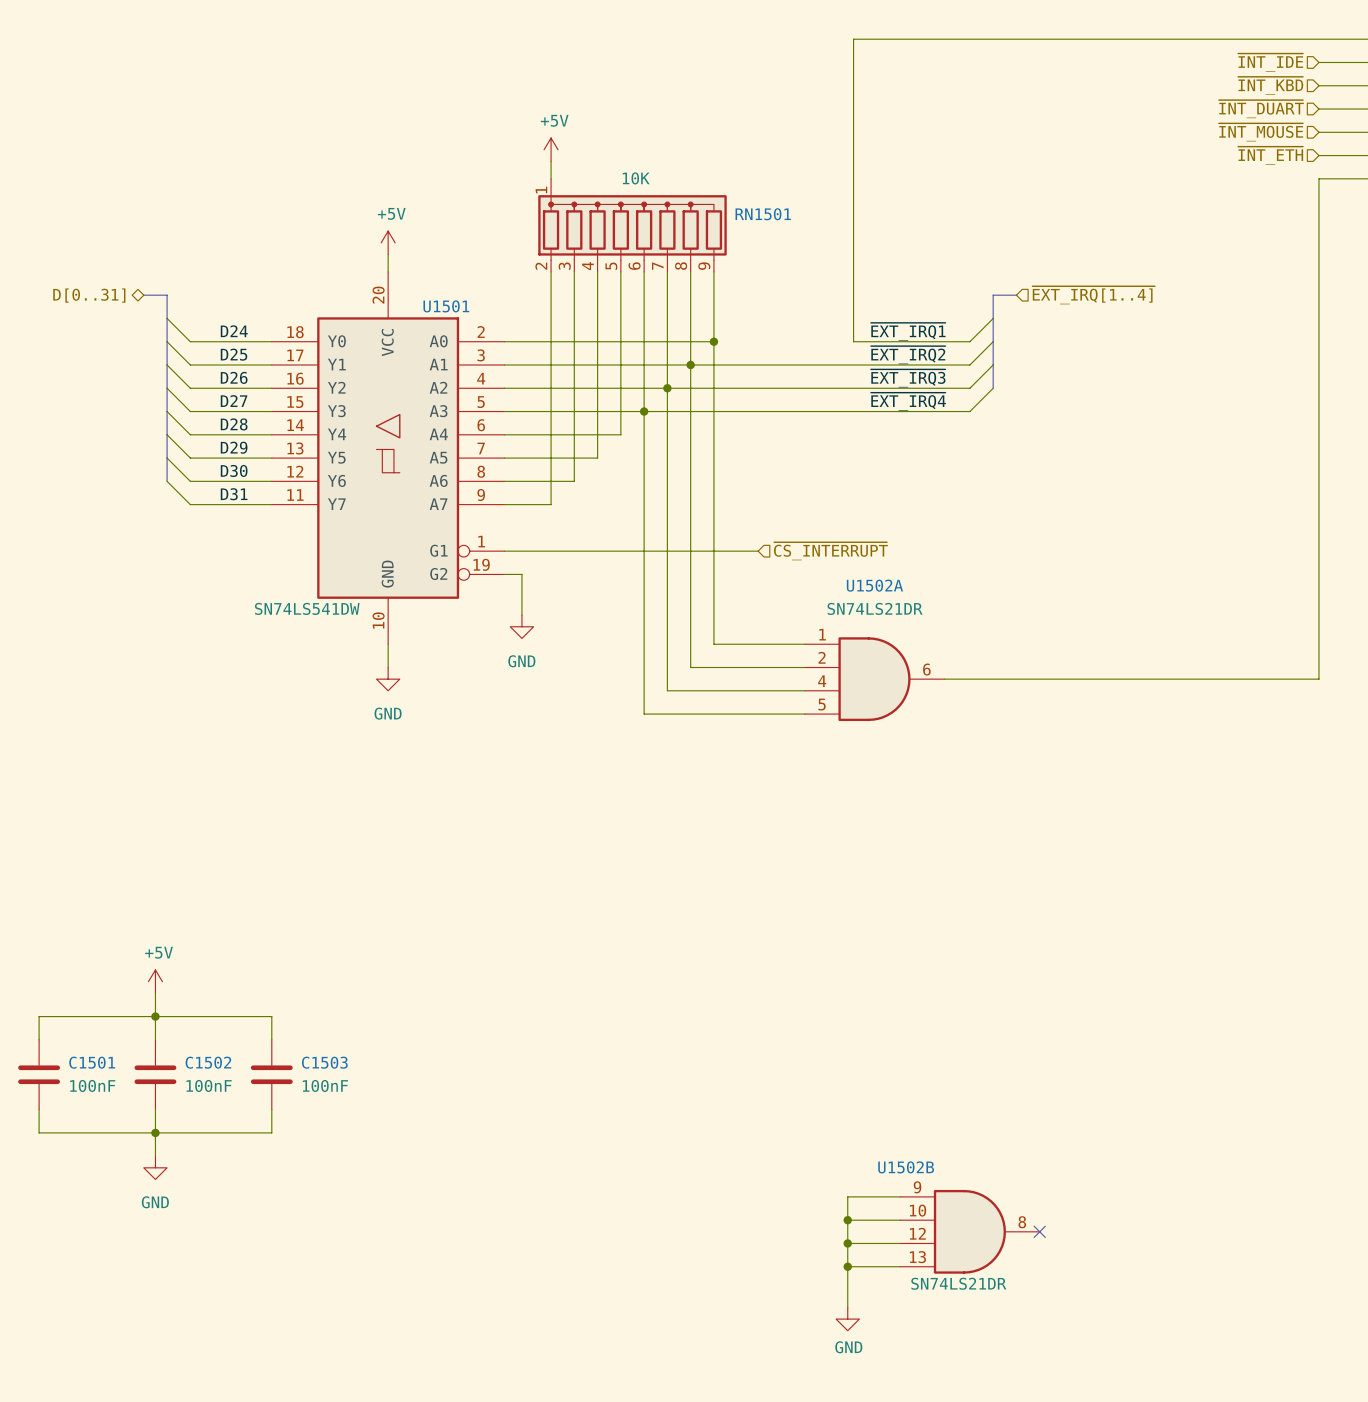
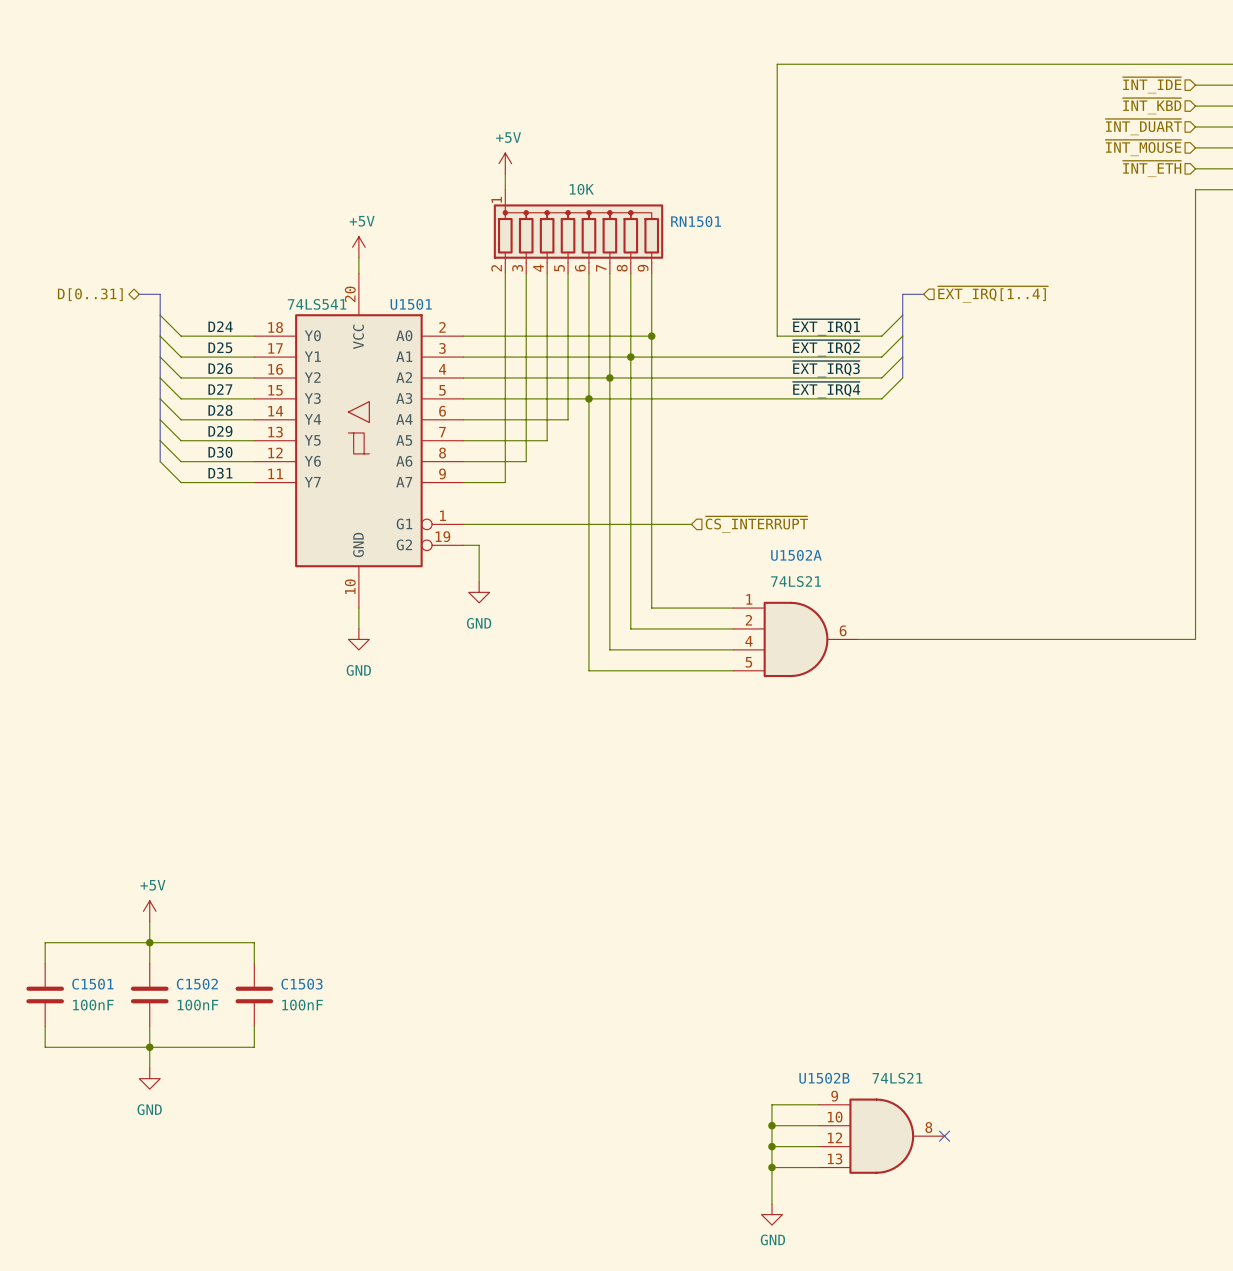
U1501 value: SN74LS541DW (307, 608) -> 74LS541 (317, 304)
U1502A value: SN74LS21DR (875, 608) -> 74LS21 (796, 581)
U1502B value: SN74LS21DR (958, 1283) -> 74LS21 (897, 1078)

